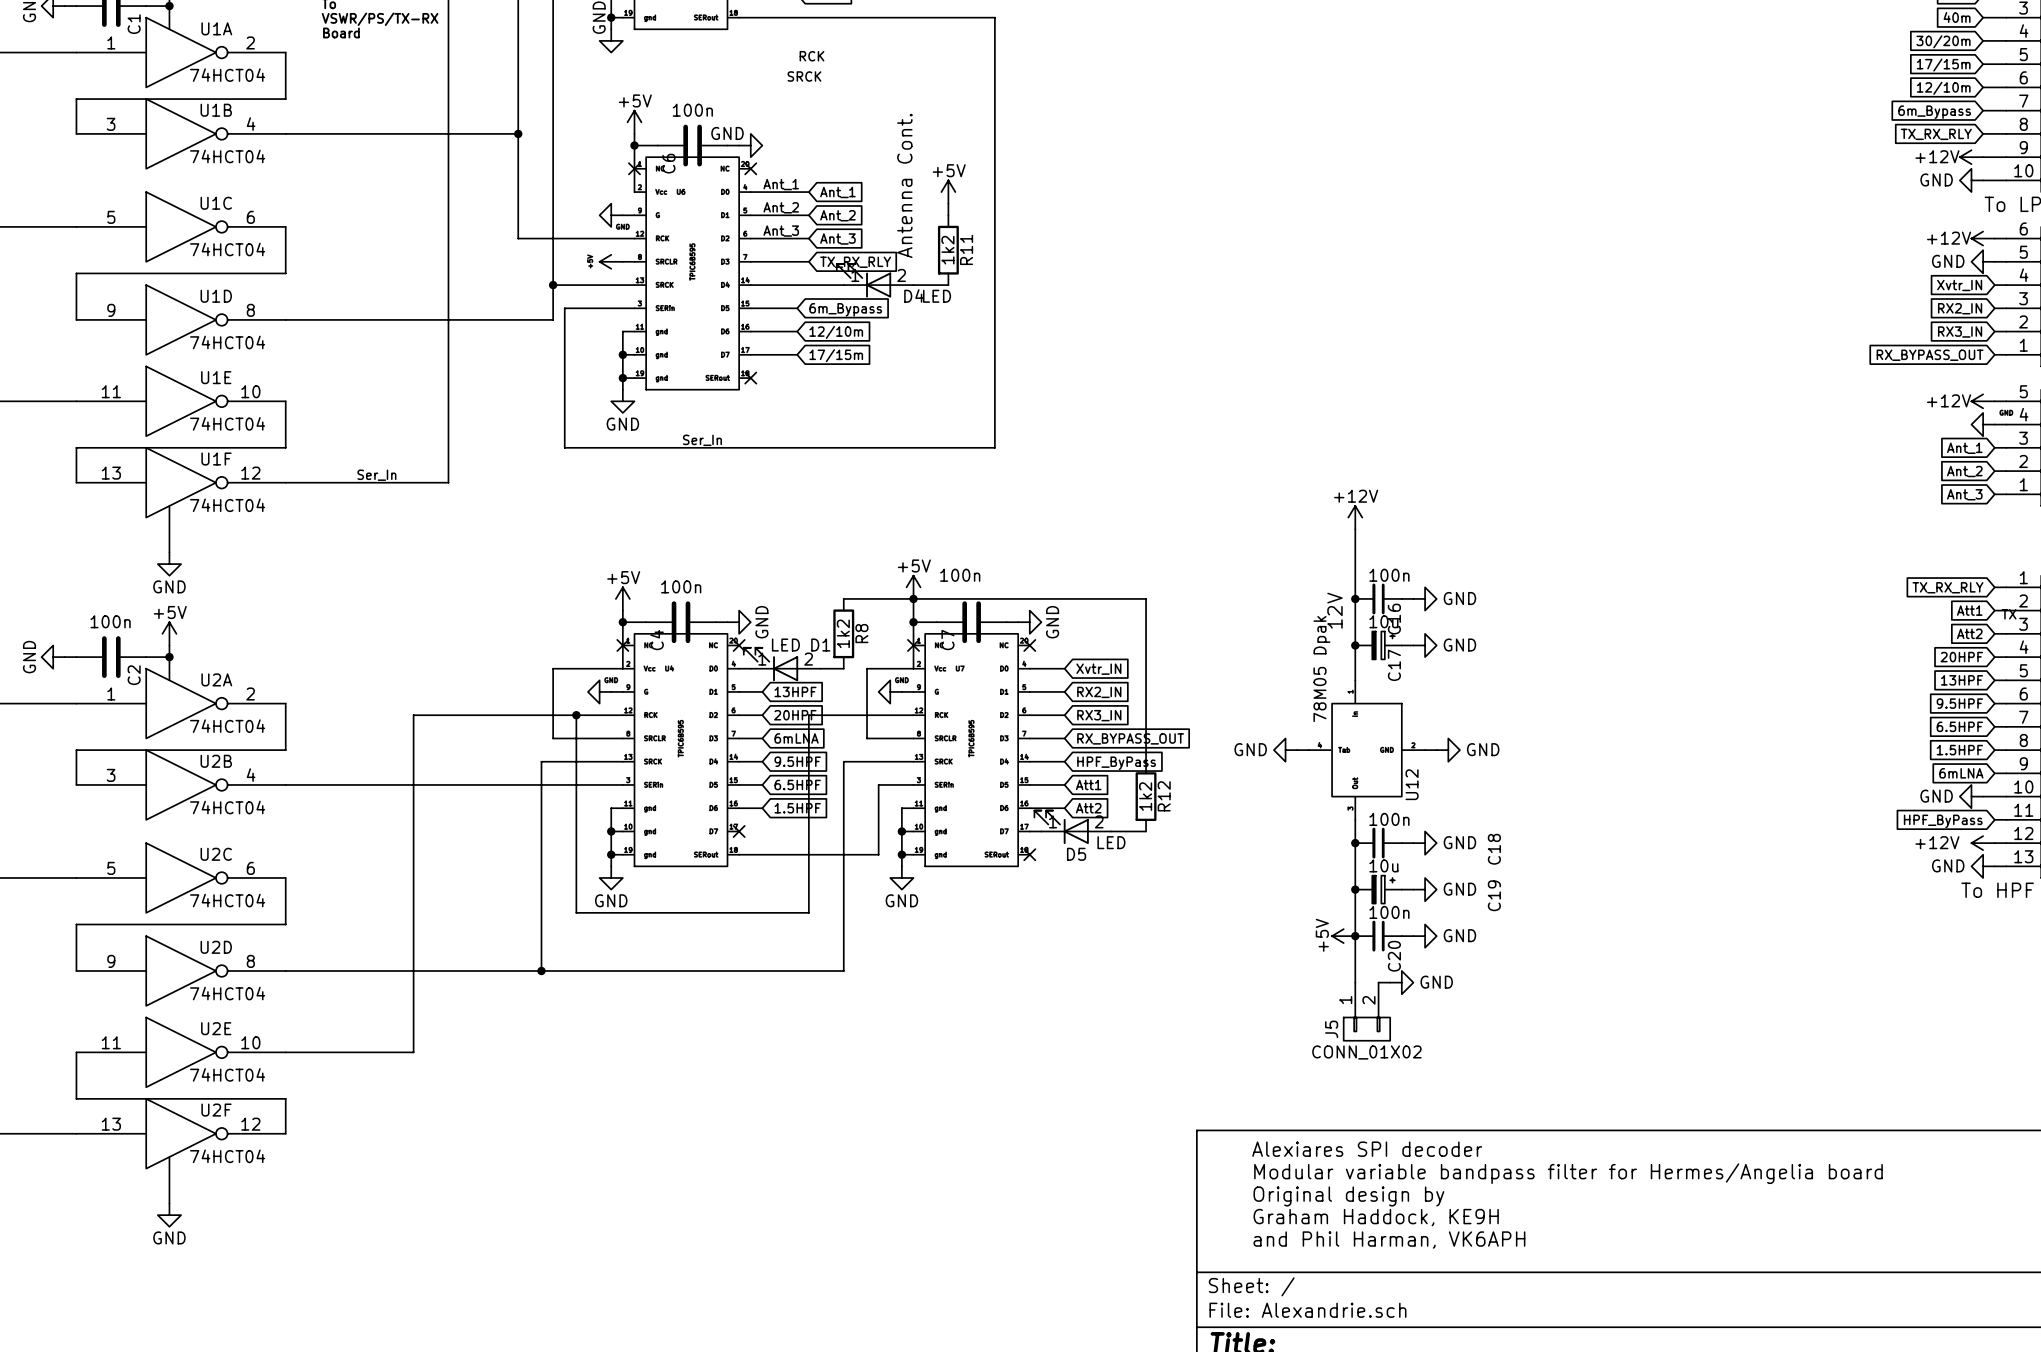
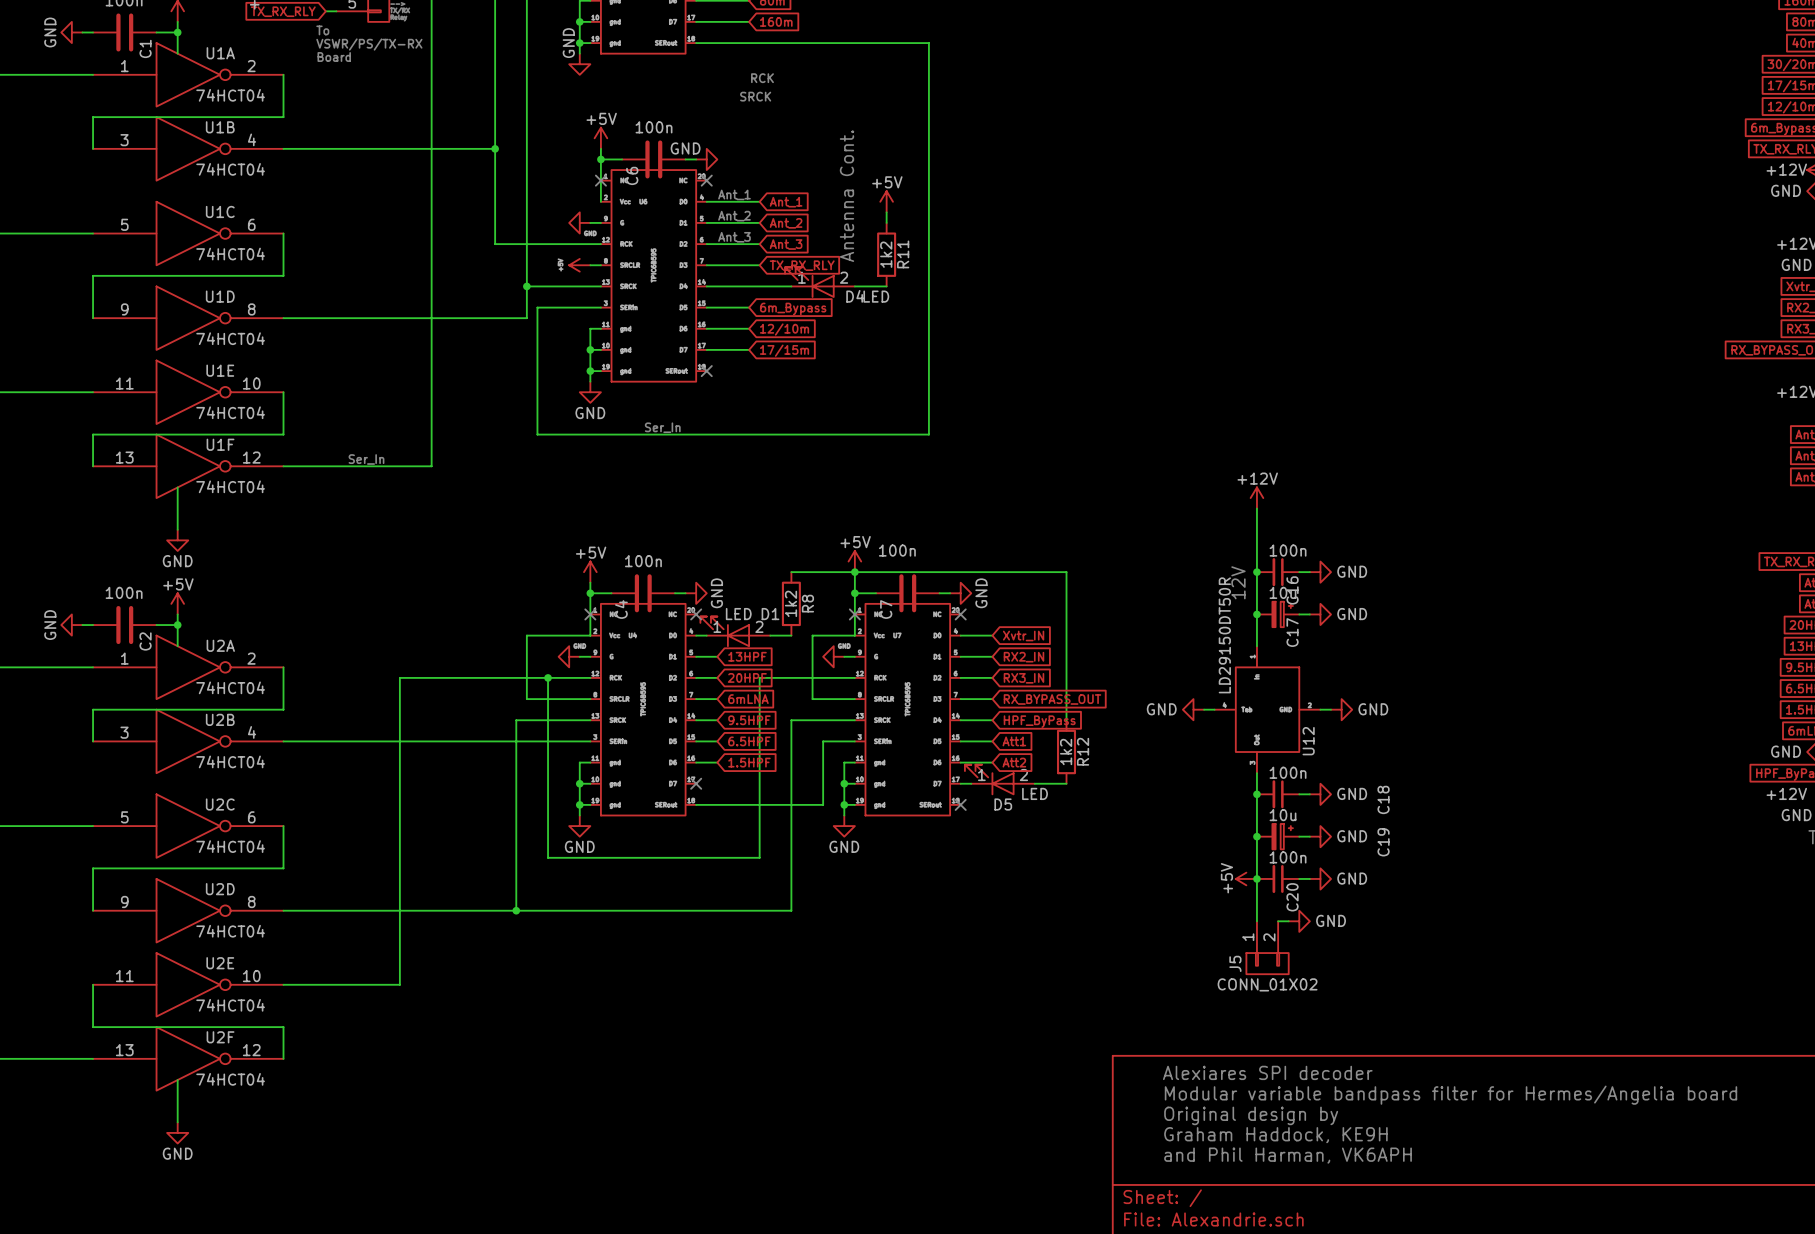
U12 value: 78M05 Dpak (1321, 668) -> LD29150DT50R (1224, 635)

